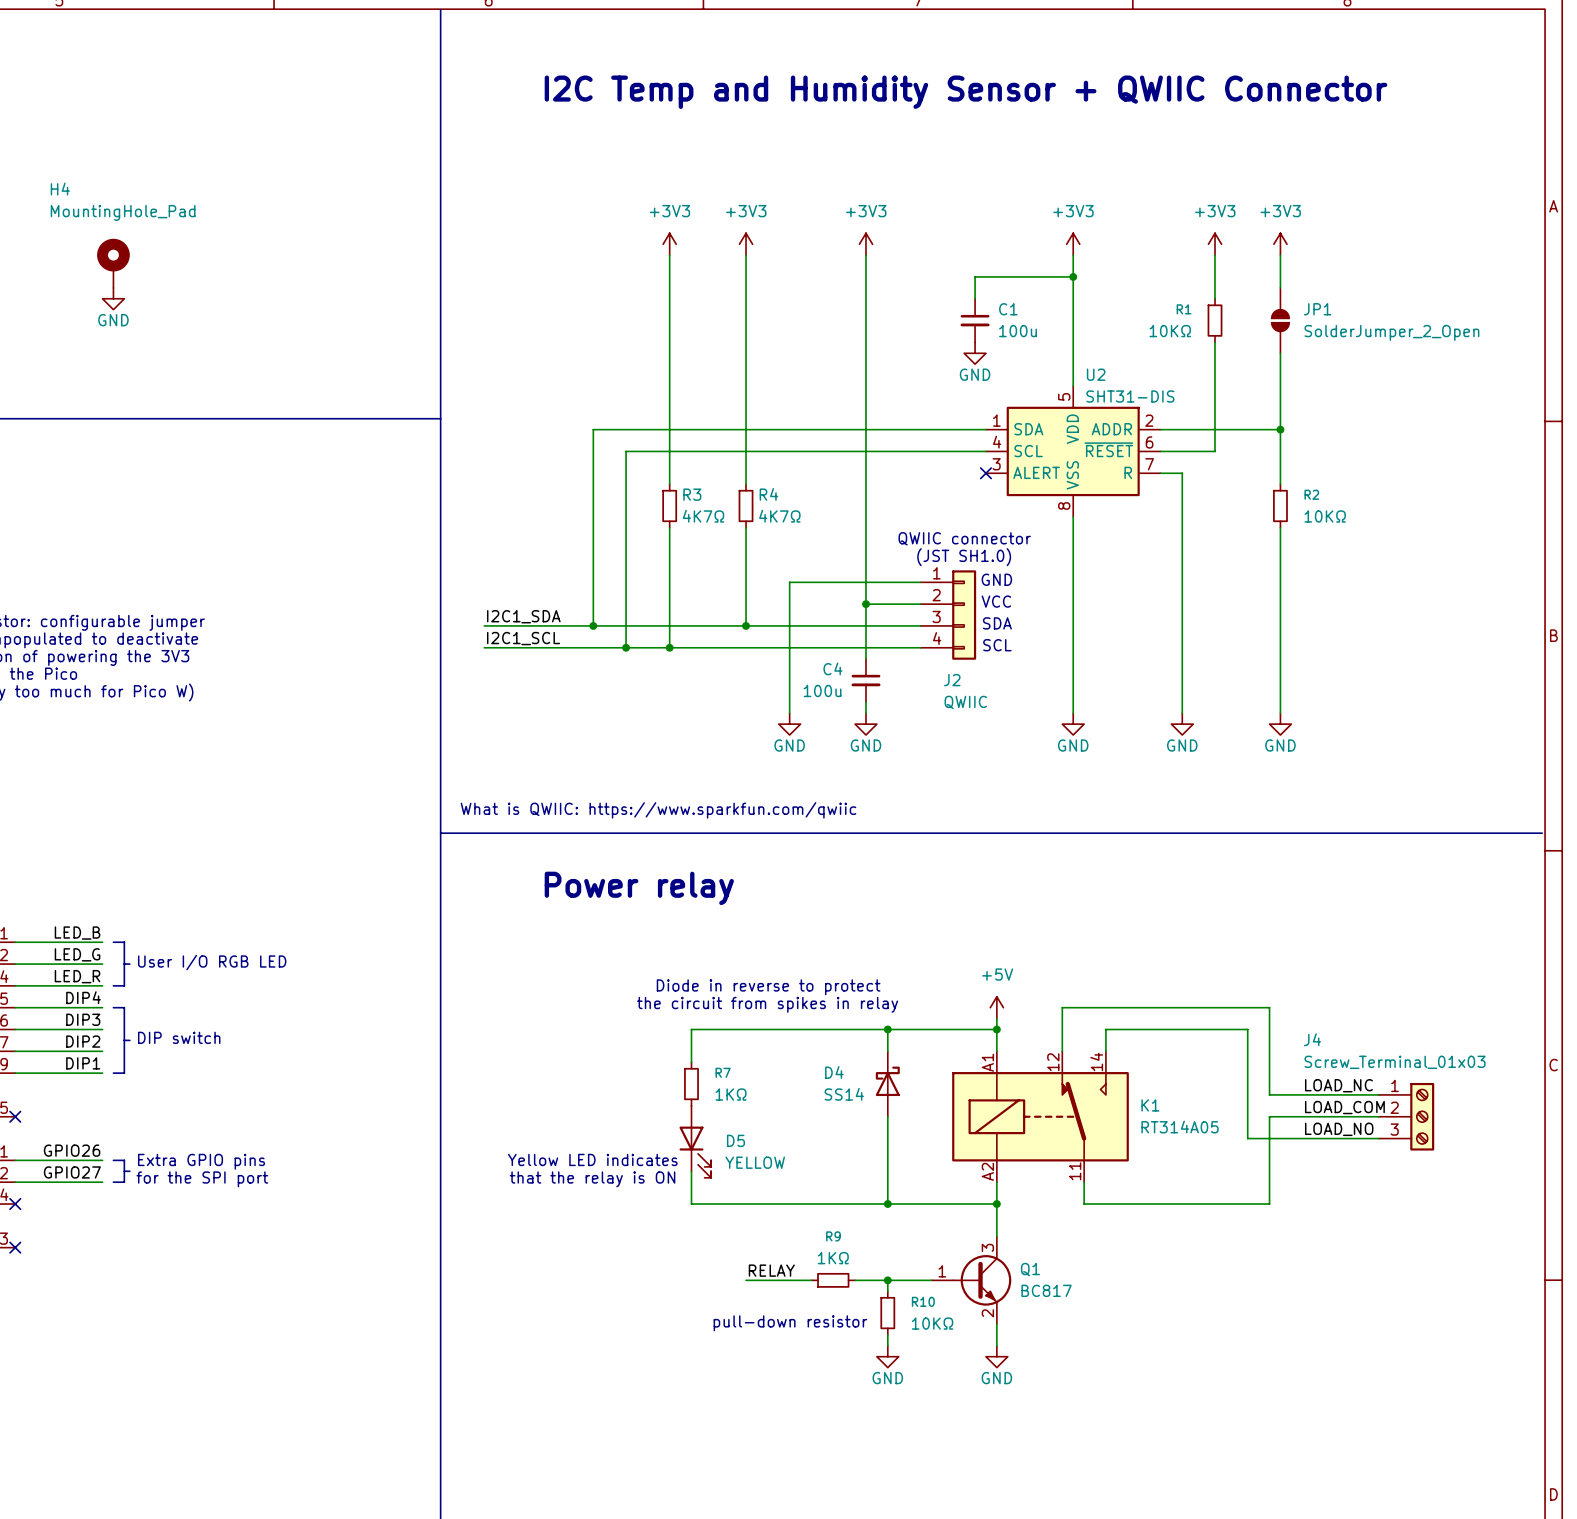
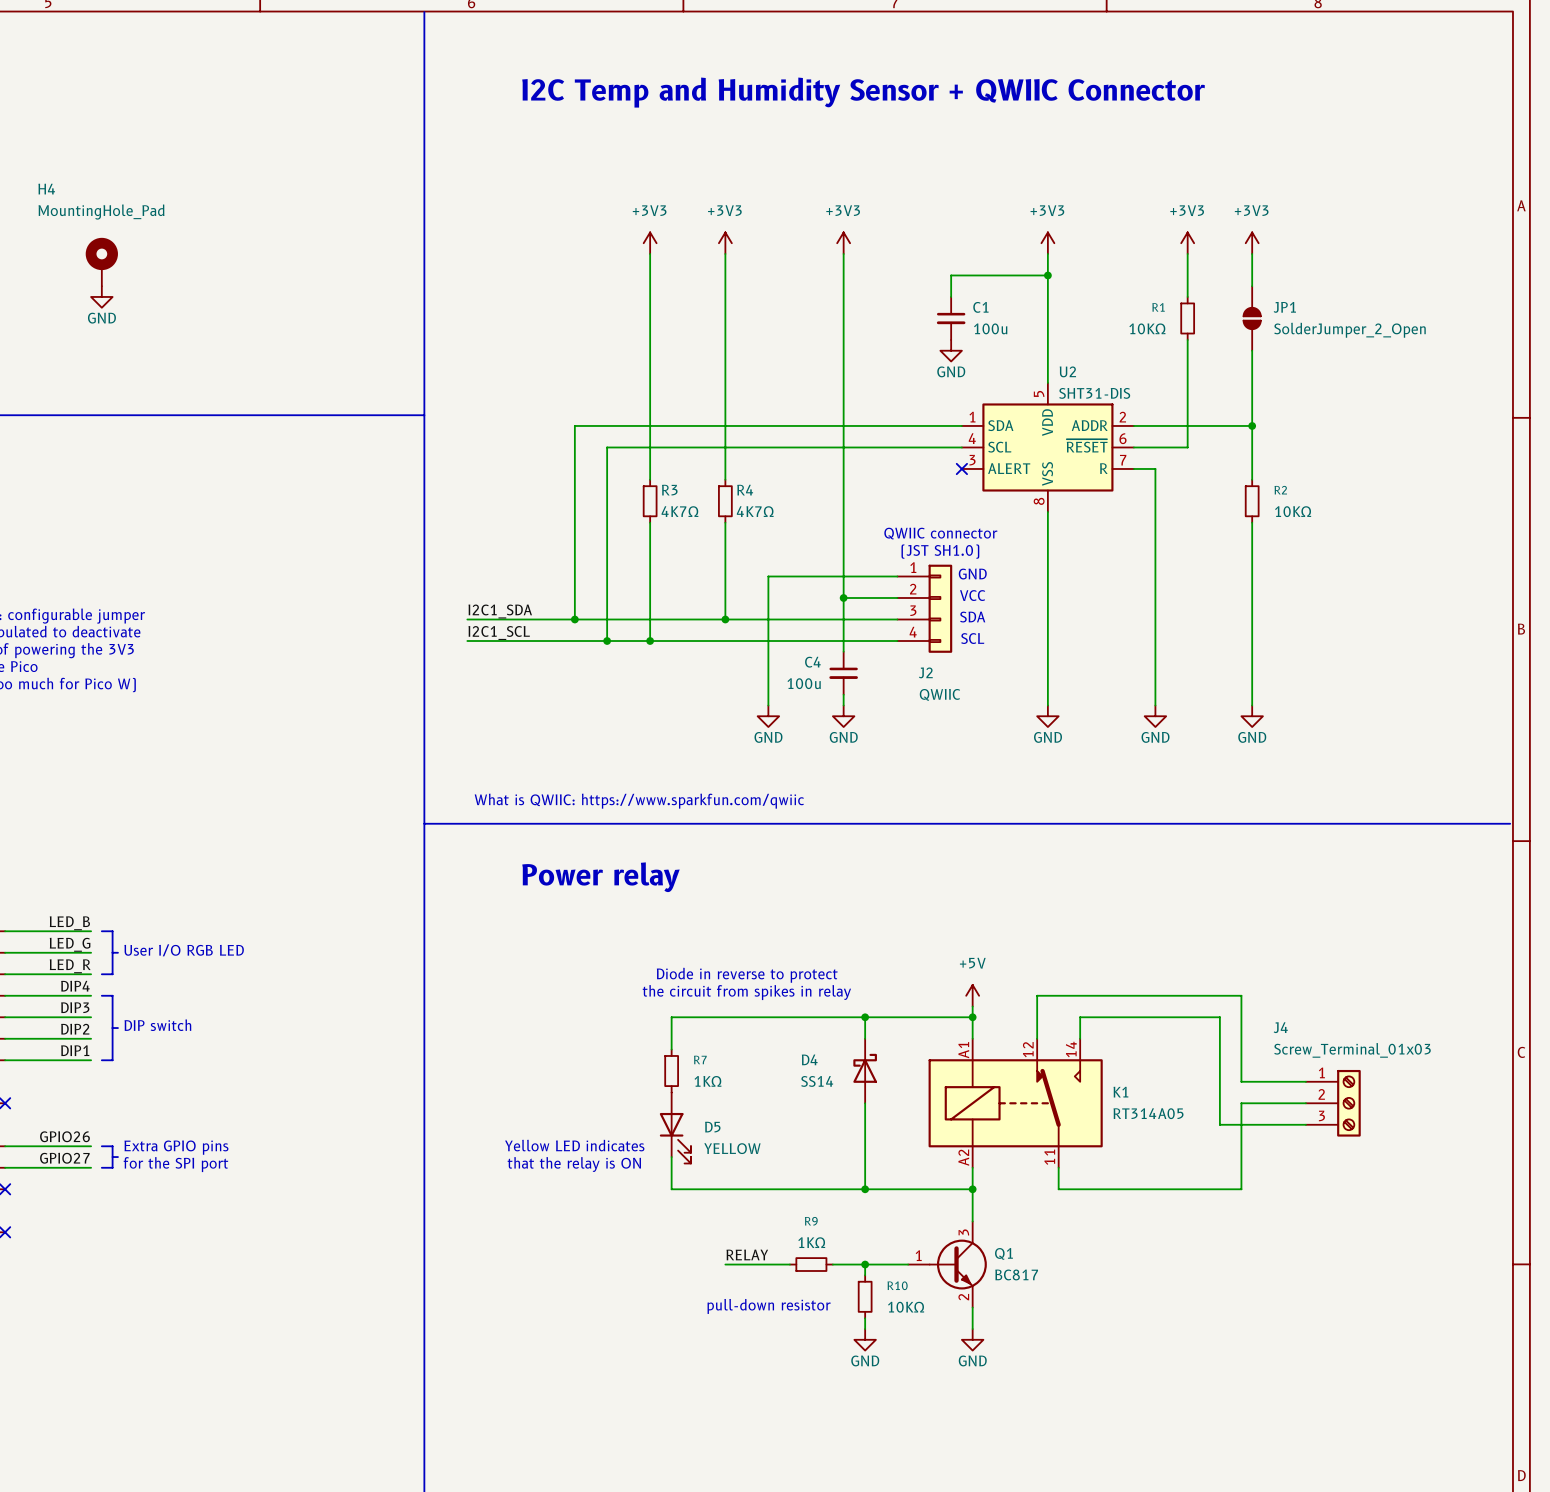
label: LOAD_NC (1338, 1085) -> none
label: LOAD_COM (1344, 1107) -> none
J4 position: (1406, 1116) -> (1333, 1103)
label: LOAD_NO (1339, 1129) -> none

